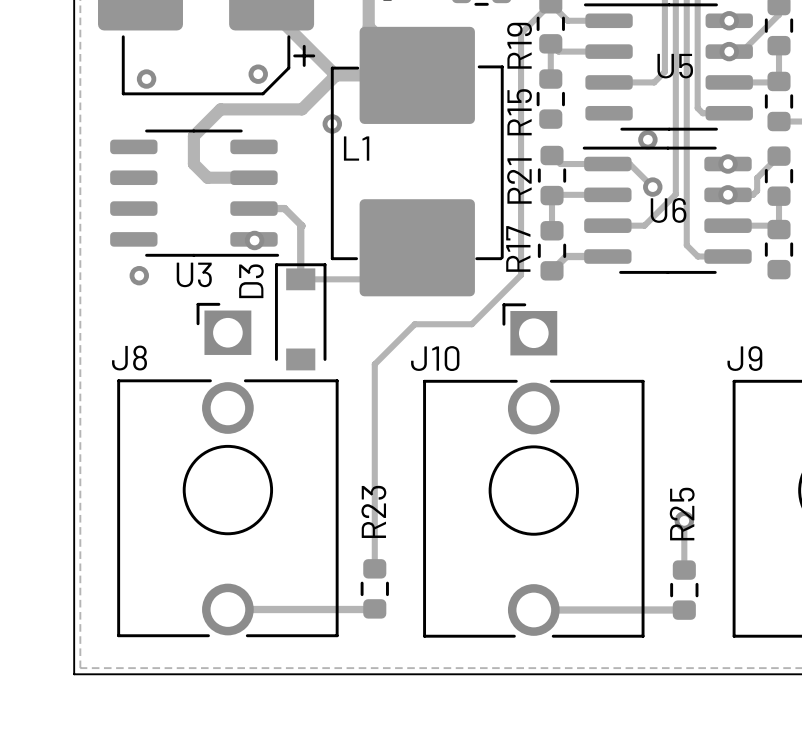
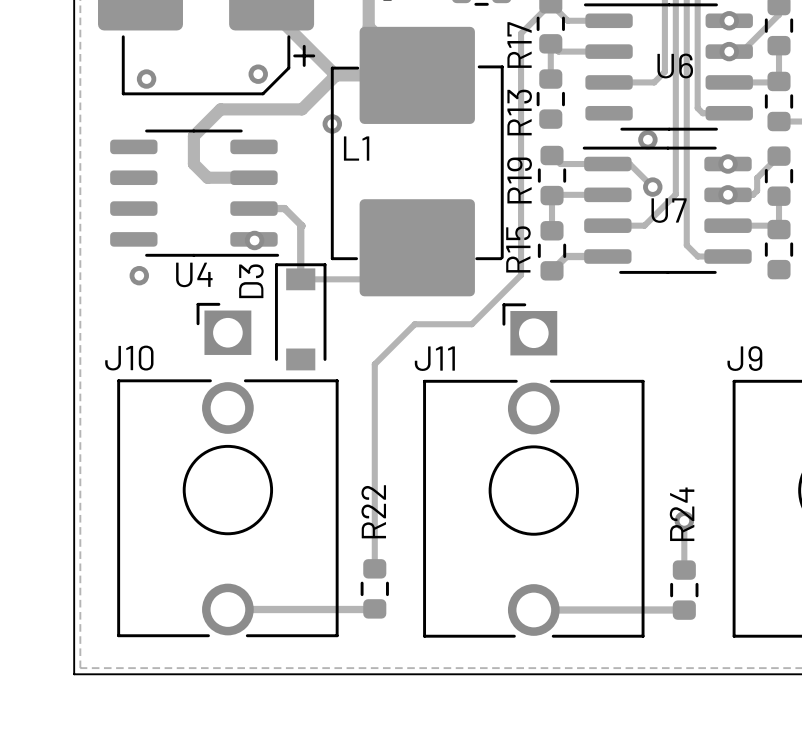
R19 name: R19 (519, 45) -> R17 (519, 45)
U5 name: U5 (675, 66) -> U6 (675, 65)
R15 name: R15 (519, 112) -> R13 (519, 112)
R21 name: R21 (519, 180) -> R19 (519, 180)
U6 name: U6 (668, 210) -> U7 (669, 210)
R17 name: R17 (518, 248) -> R15 (518, 249)
U3 name: U3 (194, 274) -> U4 (194, 274)
J8 name: J8 (129, 358) -> J10 (129, 358)
J10 name: J10 (435, 358) -> J11 (434, 358)
R23 name: R23 (373, 511) -> R22 (373, 511)
R25 name: R25 (682, 514) -> R24 (682, 514)

